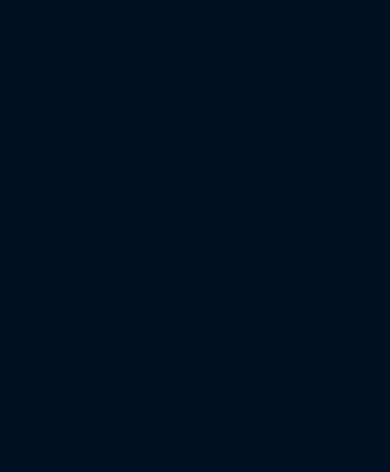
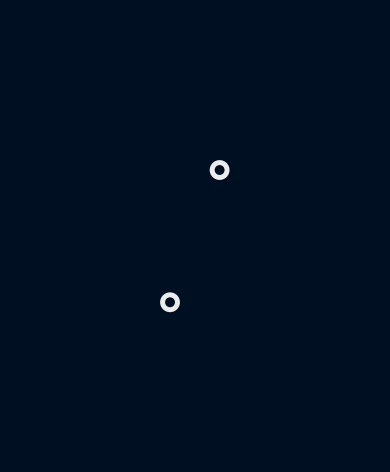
via: none -> (219, 170)
via: none -> (170, 302)

